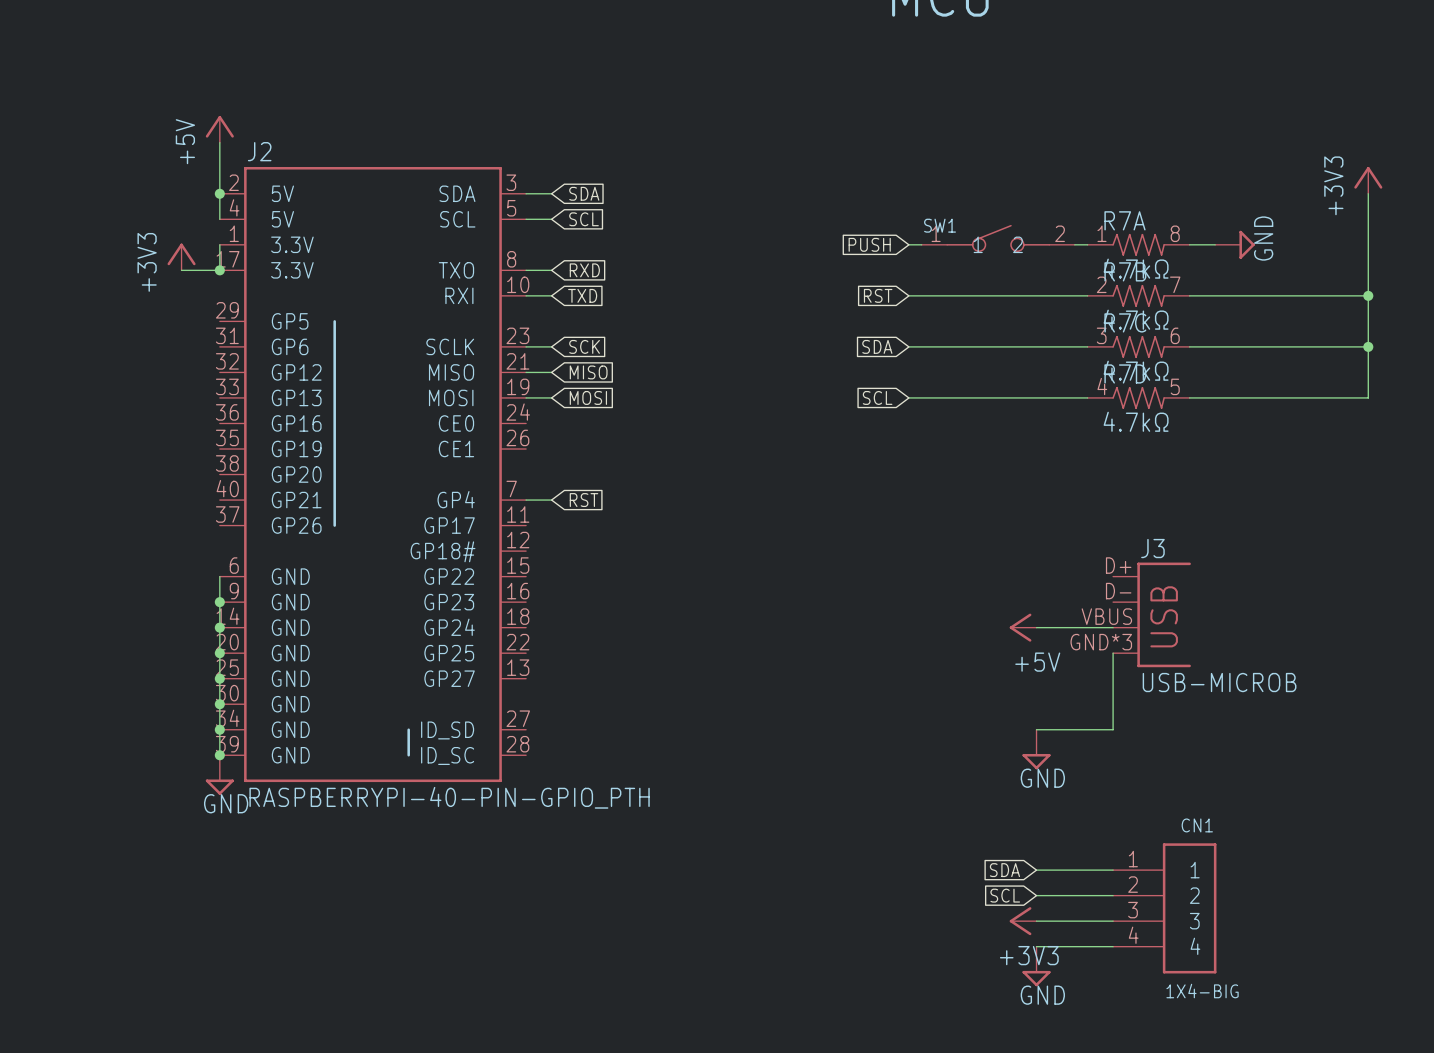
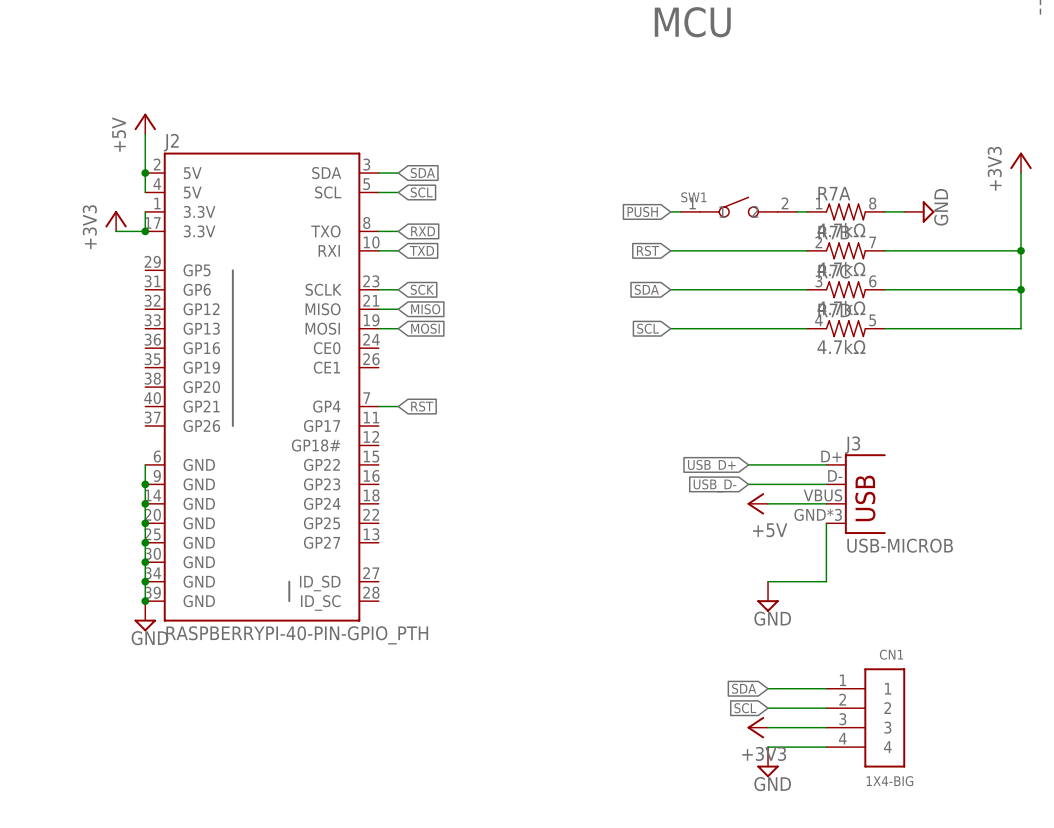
wire: none -> (748, 464) (826, 464)
global label: none -> USB_D+ (711, 466)
global label: none -> USB_D- (714, 485)
wire: none -> (748, 484) (826, 484)

